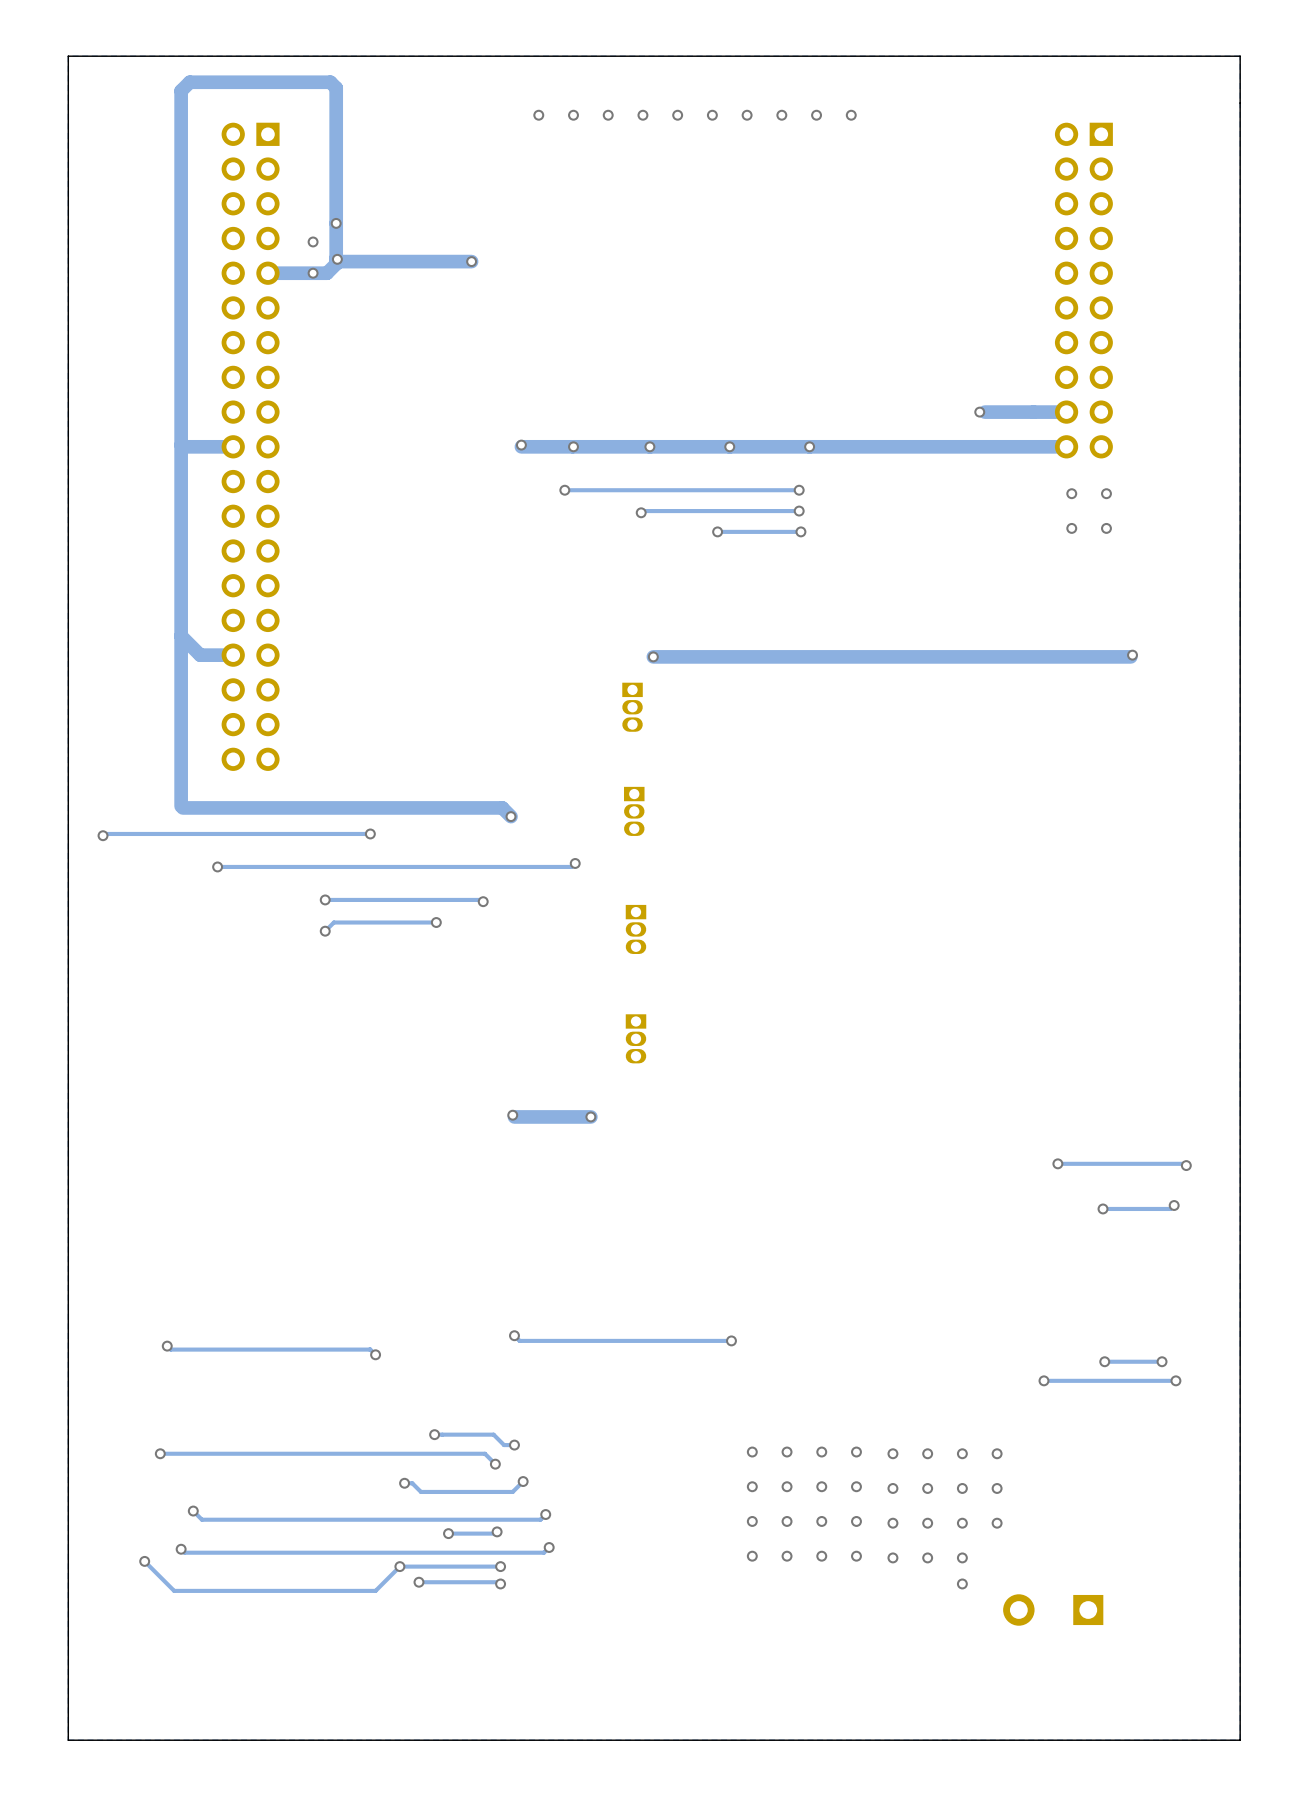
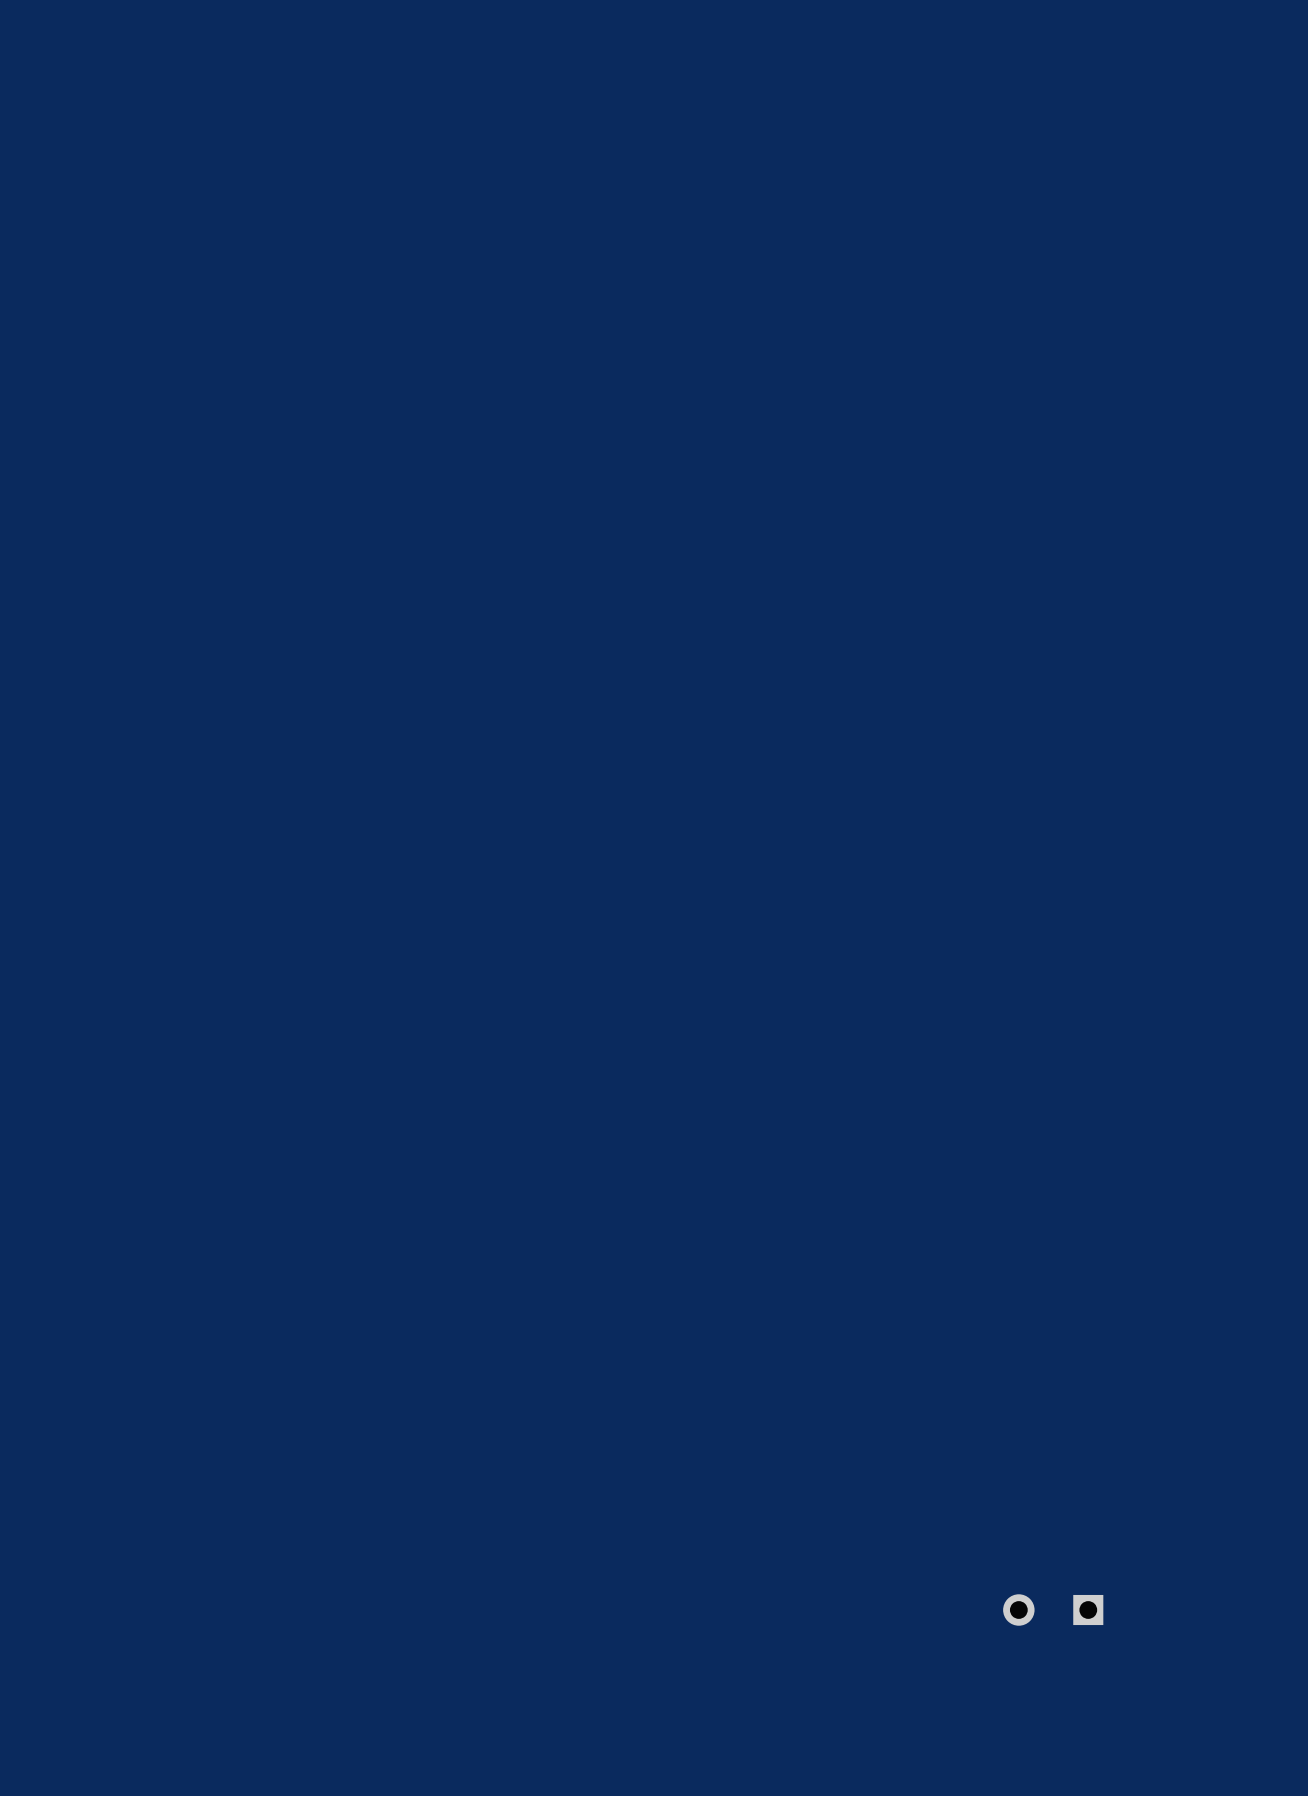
board edge: (1240, 56) (1240, 1740) (68, 1740) (68, 56) (1240, 56) -> none
via: (538, 115) -> none
via: (573, 115) -> none
via: (608, 115) -> none
via: (642, 115) -> none
via: (677, 115) -> none
via: (712, 115) -> none
via: (747, 115) -> none
via: (781, 115) -> none
via: (816, 115) -> none
via: (851, 115) -> none
via: (336, 223) -> none
via: (313, 241) -> none
via: (337, 259) -> none
track: (471, 261) (336, 261) -> none
via: (471, 261) -> none
track: (267, 273) (326, 273) (336, 264) (336, 87) (330, 82) (189, 82) (181, 90) (181, 806) (182, 807) (502, 807) (511, 816) -> none
via: (313, 273) -> none
part: (1083, 290) -> none
via: (979, 412) -> none
track: (1066, 412) (984, 412) -> none
track: (181, 445) (182, 446) (233, 446) -> none
via: (521, 445) -> none
track: (571, 445) (573, 446) (1066, 446) -> none
part: (250, 446) -> none
track: (571, 446) (521, 446) -> none
via: (573, 446) -> none
via: (649, 446) -> none
via: (729, 446) -> none
via: (809, 446) -> none
via: (564, 490) -> none
track: (799, 490) (564, 490) -> none
via: (799, 490) -> none
via: (1071, 493) -> none
via: (1106, 493) -> none
track: (799, 511) (642, 511) (641, 512) -> none
via: (799, 511) -> none
via: (641, 512) -> none
via: (1071, 528) -> none
via: (1106, 528) -> none
via: (717, 531) -> none
track: (800, 531) (717, 531) -> none
via: (800, 531) -> none
track: (181, 636) (200, 655) (233, 655) -> none
track: (1132, 655) (1130, 656) (653, 656) -> none
via: (1132, 655) -> none
via: (653, 656) -> none
part: (632, 707) -> none
part: (634, 811) -> none
via: (511, 816) -> none
track: (370, 833) (106, 833) (103, 835) -> none
via: (370, 833) -> none
via: (103, 835) -> none
track: (575, 863) (571, 866) (217, 866) -> none
via: (575, 863) -> none
via: (217, 866) -> none
track: (325, 899) (481, 899) (483, 901) -> none
via: (325, 899) -> none
via: (483, 901) -> none
track: (436, 922) (333, 922) (325, 931) -> none
via: (436, 922) -> none
part: (636, 929) -> none
via: (325, 931) -> none
part: (636, 1038) -> none
track: (512, 1115) (514, 1116) (590, 1116) -> none
via: (512, 1115) -> none
via: (590, 1116) -> none
track: (1057, 1163) (1184, 1163) (1186, 1165) -> none
via: (1057, 1163) -> none
via: (1186, 1165) -> none
track: (1174, 1205) (1170, 1208) (1103, 1208) -> none
via: (1174, 1205) -> none
via: (1103, 1208) -> none
track: (514, 1335) (519, 1340) (731, 1340) -> none
via: (514, 1335) -> none
via: (731, 1340) -> none
track: (167, 1346) (170, 1349) (370, 1349) (375, 1354) -> none
via: (167, 1346) -> none
via: (375, 1354) -> none
via: (1104, 1361) -> none
track: (1162, 1361) (1104, 1361) -> none
via: (1162, 1361) -> none
via: (1043, 1380) -> none
track: (1175, 1380) (1043, 1380) -> none
via: (1175, 1380) -> none
track: (434, 1434) (493, 1434) (504, 1445) (514, 1445) -> none
via: (434, 1434) -> none
via: (514, 1445) -> none
via: (752, 1452) -> none
via: (787, 1452) -> none
via: (821, 1452) -> none
via: (856, 1452) -> none
track: (160, 1453) (484, 1453) (495, 1464) -> none
via: (160, 1453) -> none
via: (892, 1453) -> none
via: (927, 1453) -> none
via: (962, 1453) -> none
via: (997, 1453) -> none
via: (495, 1464) -> none
track: (523, 1481) (512, 1491) (420, 1491) (412, 1483) (404, 1483) -> none
via: (523, 1481) -> none
via: (404, 1483) -> none
via: (752, 1486) -> none
via: (787, 1486) -> none
via: (821, 1486) -> none
via: (856, 1486) -> none
via: (892, 1488) -> none
via: (927, 1488) -> none
via: (962, 1488) -> none
via: (997, 1488) -> none
track: (193, 1511) (201, 1519) (540, 1519) (545, 1514) -> none
via: (193, 1511) -> none
via: (545, 1514) -> none
via: (752, 1521) -> none
via: (787, 1521) -> none
via: (821, 1521) -> none
via: (856, 1521) -> none
via: (892, 1523) -> none
via: (927, 1523) -> none
via: (962, 1523) -> none
via: (997, 1523) -> none
track: (497, 1531) (495, 1533) (448, 1533) -> none
via: (497, 1531) -> none
via: (448, 1533) -> none
track: (549, 1547) (543, 1552) (184, 1552) (181, 1549) -> none
via: (549, 1547) -> none
via: (181, 1549) -> none
via: (752, 1556) -> none
via: (787, 1556) -> none
via: (821, 1556) -> none
via: (856, 1556) -> none
via: (892, 1557) -> none
via: (927, 1557) -> none
via: (962, 1557) -> none
track: (144, 1561) (174, 1590) (375, 1590) (399, 1566) (500, 1566) -> none
via: (144, 1561) -> none
via: (399, 1566) -> none
via: (500, 1566) -> none
track: (418, 1582) (498, 1582) (500, 1583) -> none
via: (418, 1582) -> none
via: (500, 1583) -> none
via: (962, 1583) -> none

